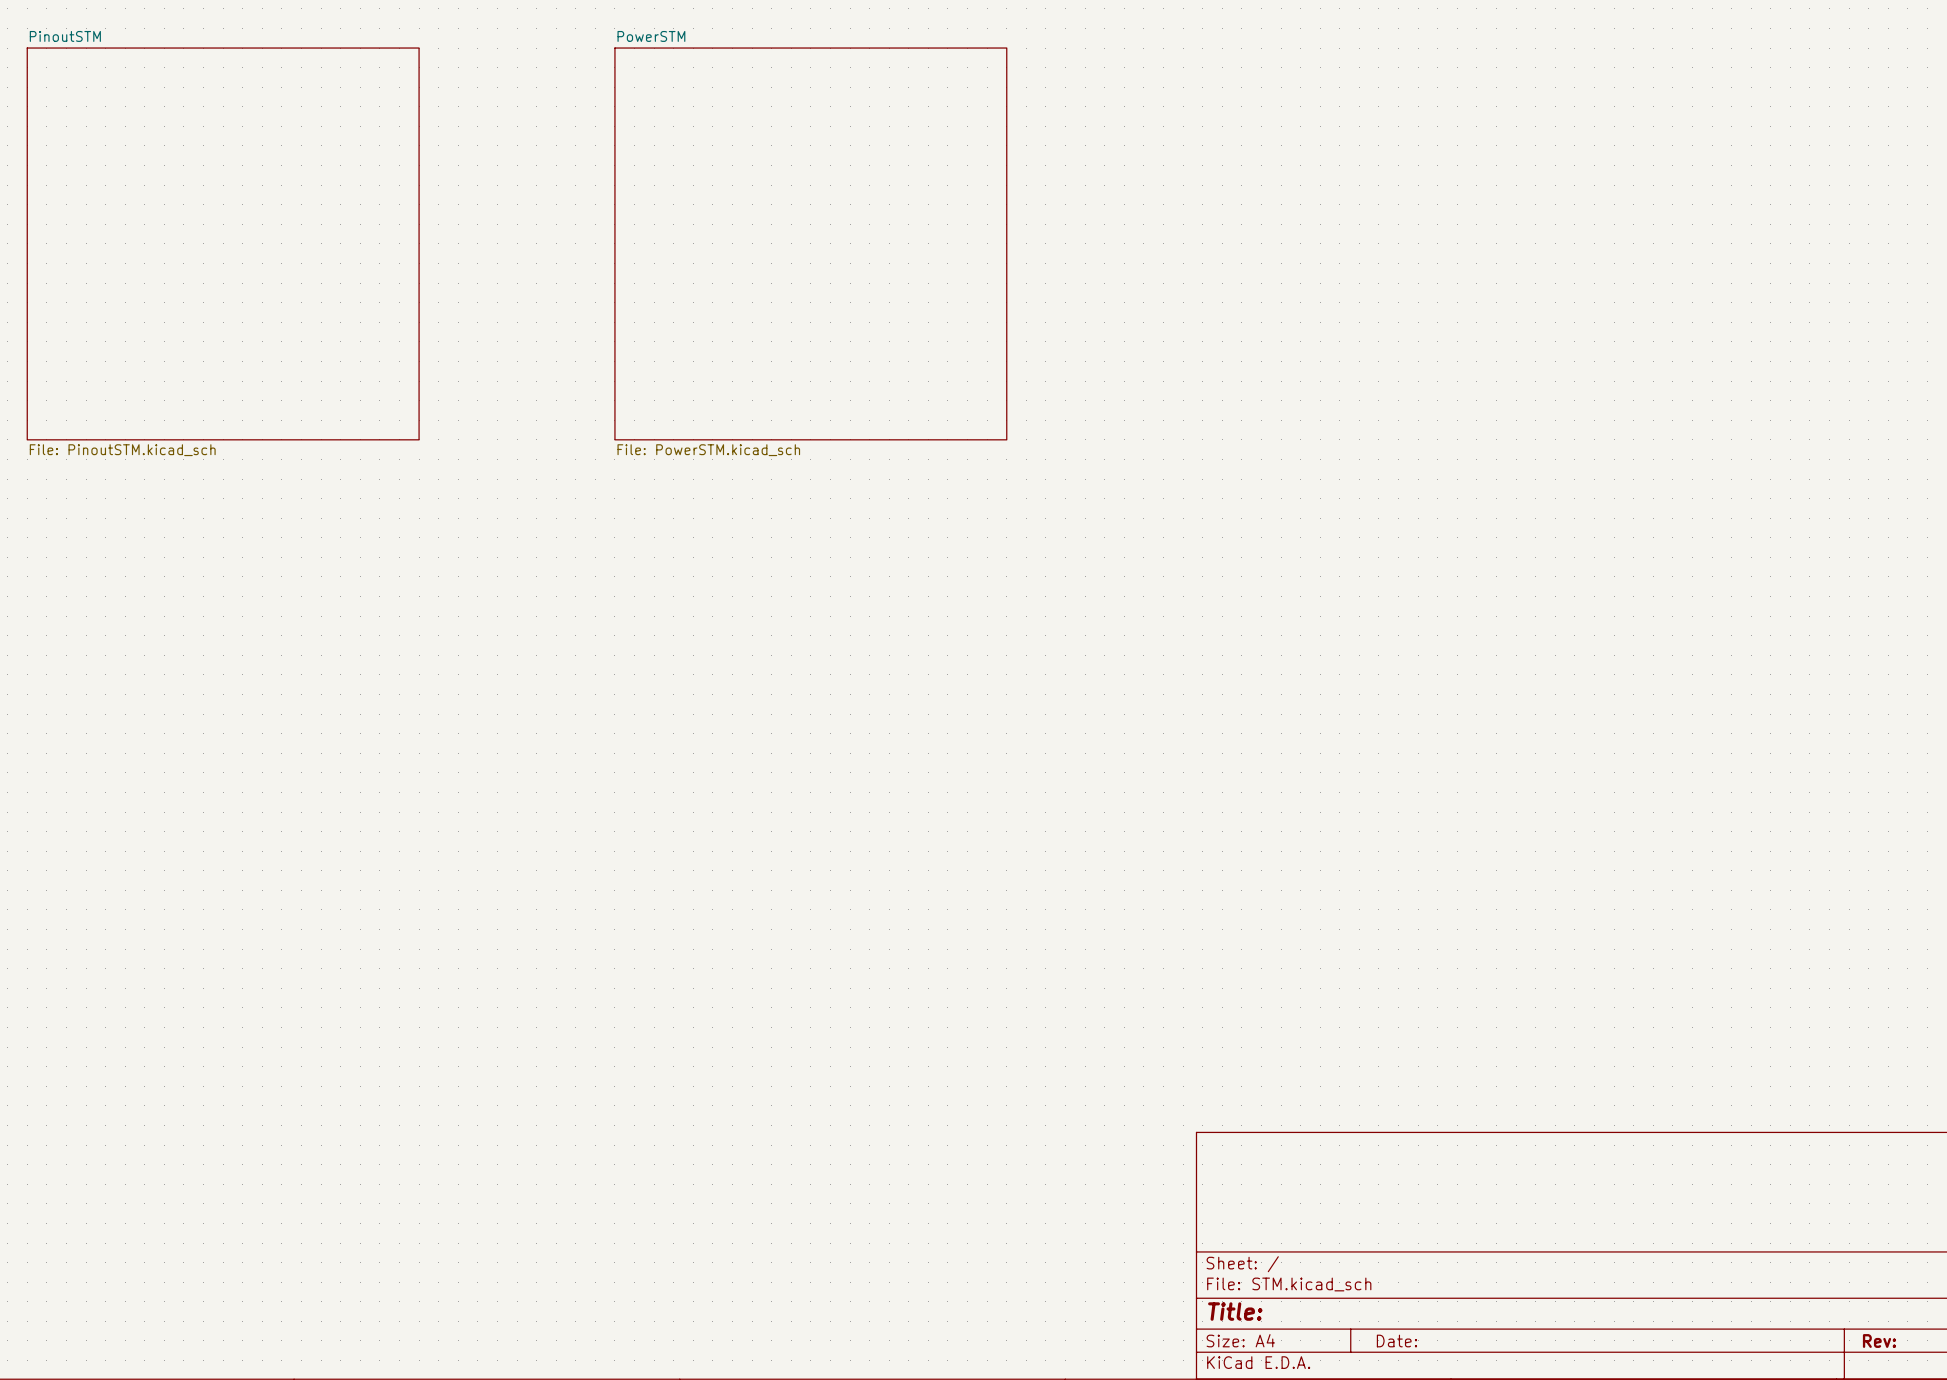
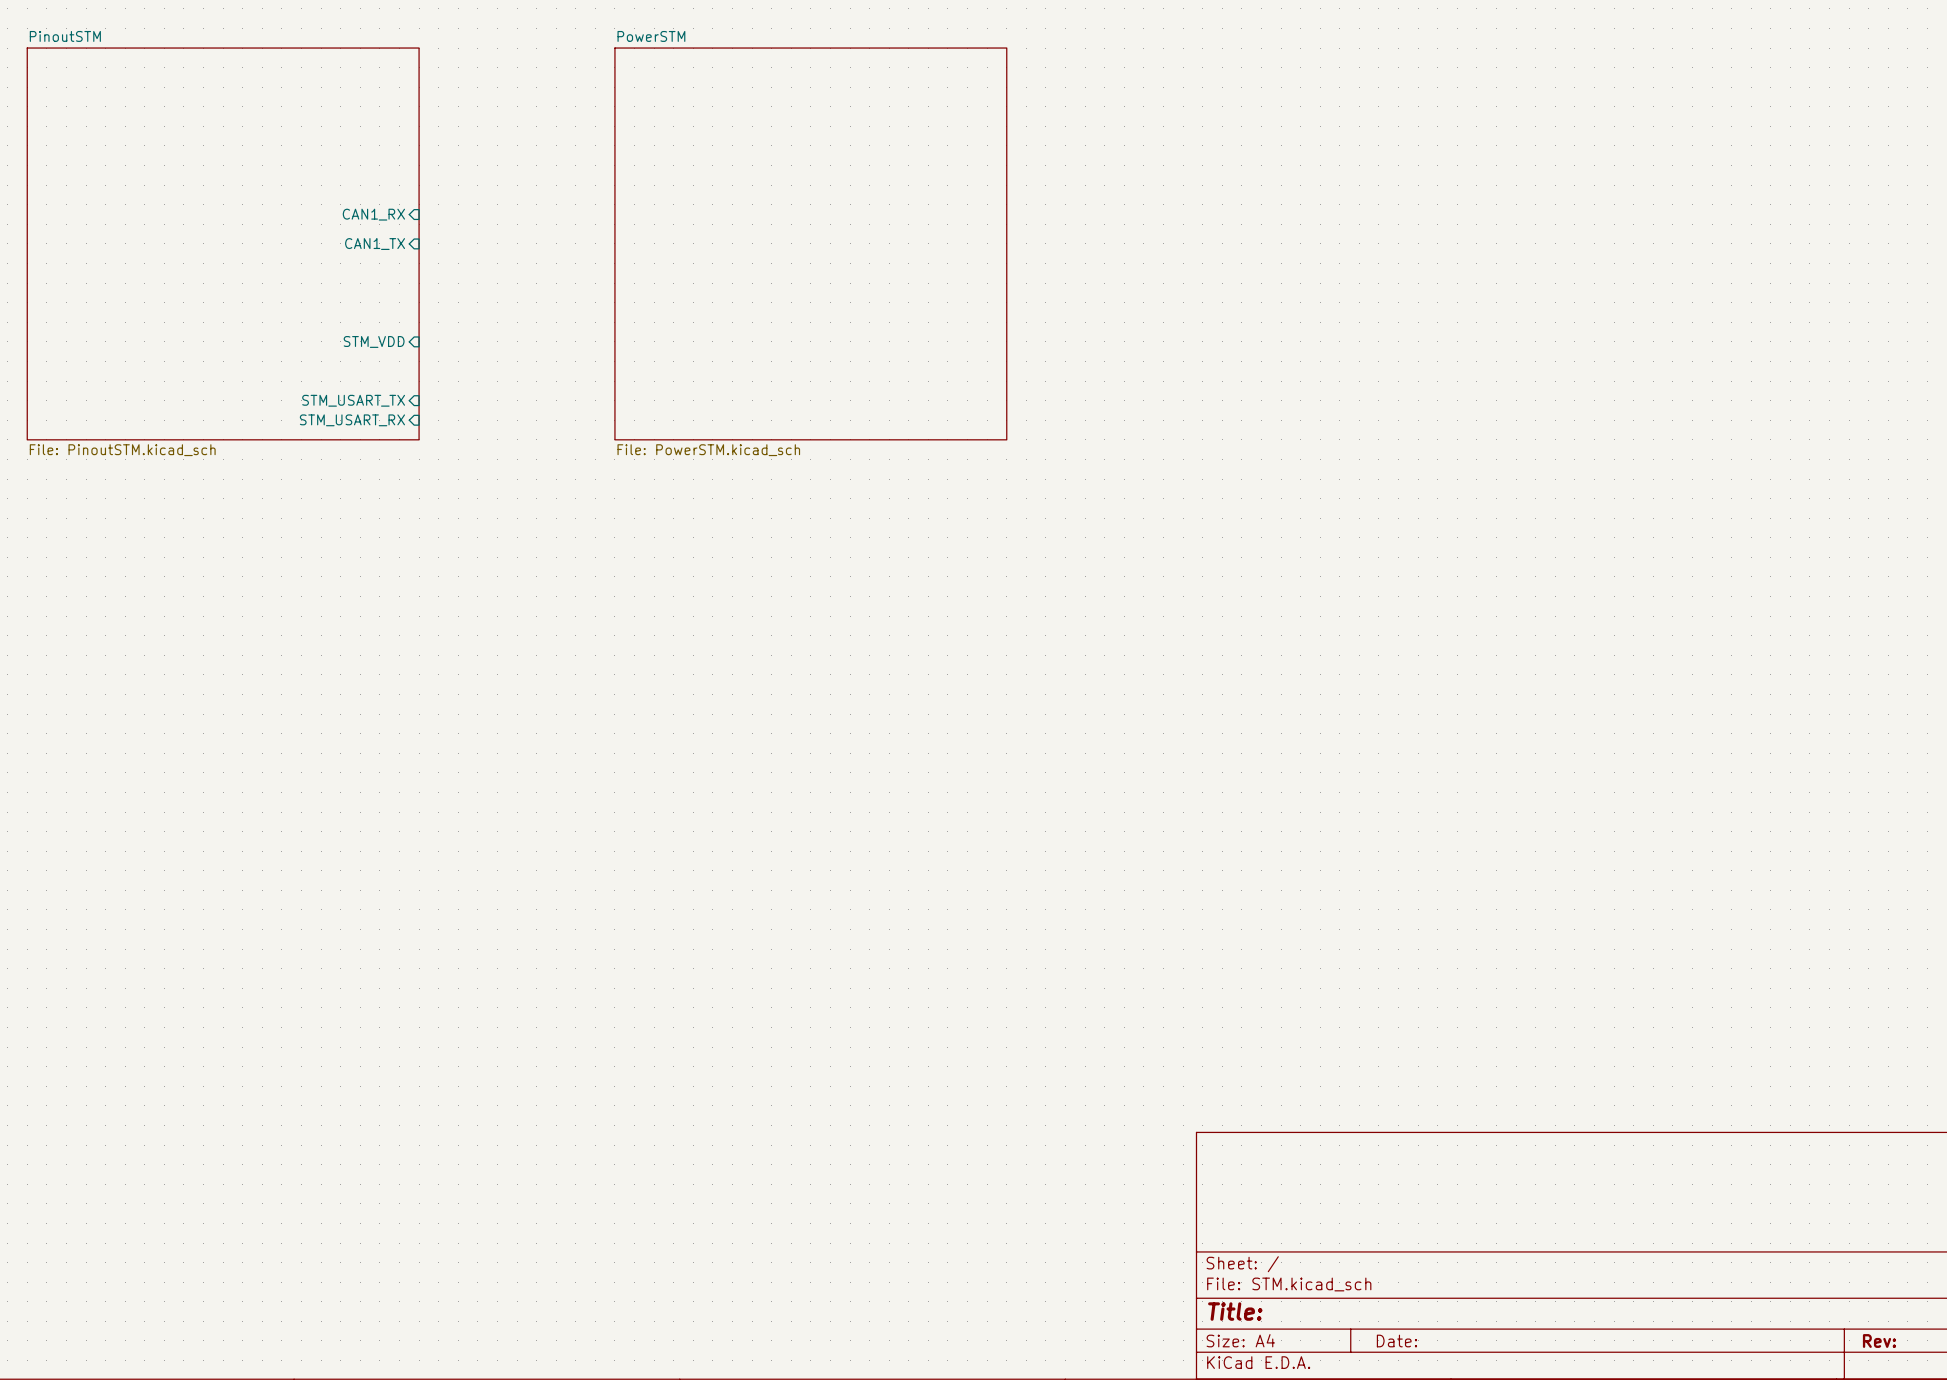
sheet pin: none -> CAN1_RX (373, 214)
sheet pin: none -> CAN1_TX (375, 244)
sheet pin: none -> STM_VDD (374, 341)
sheet pin: none -> STM_USART_TX (353, 400)
sheet pin: none -> STM_USART_RX (352, 420)

